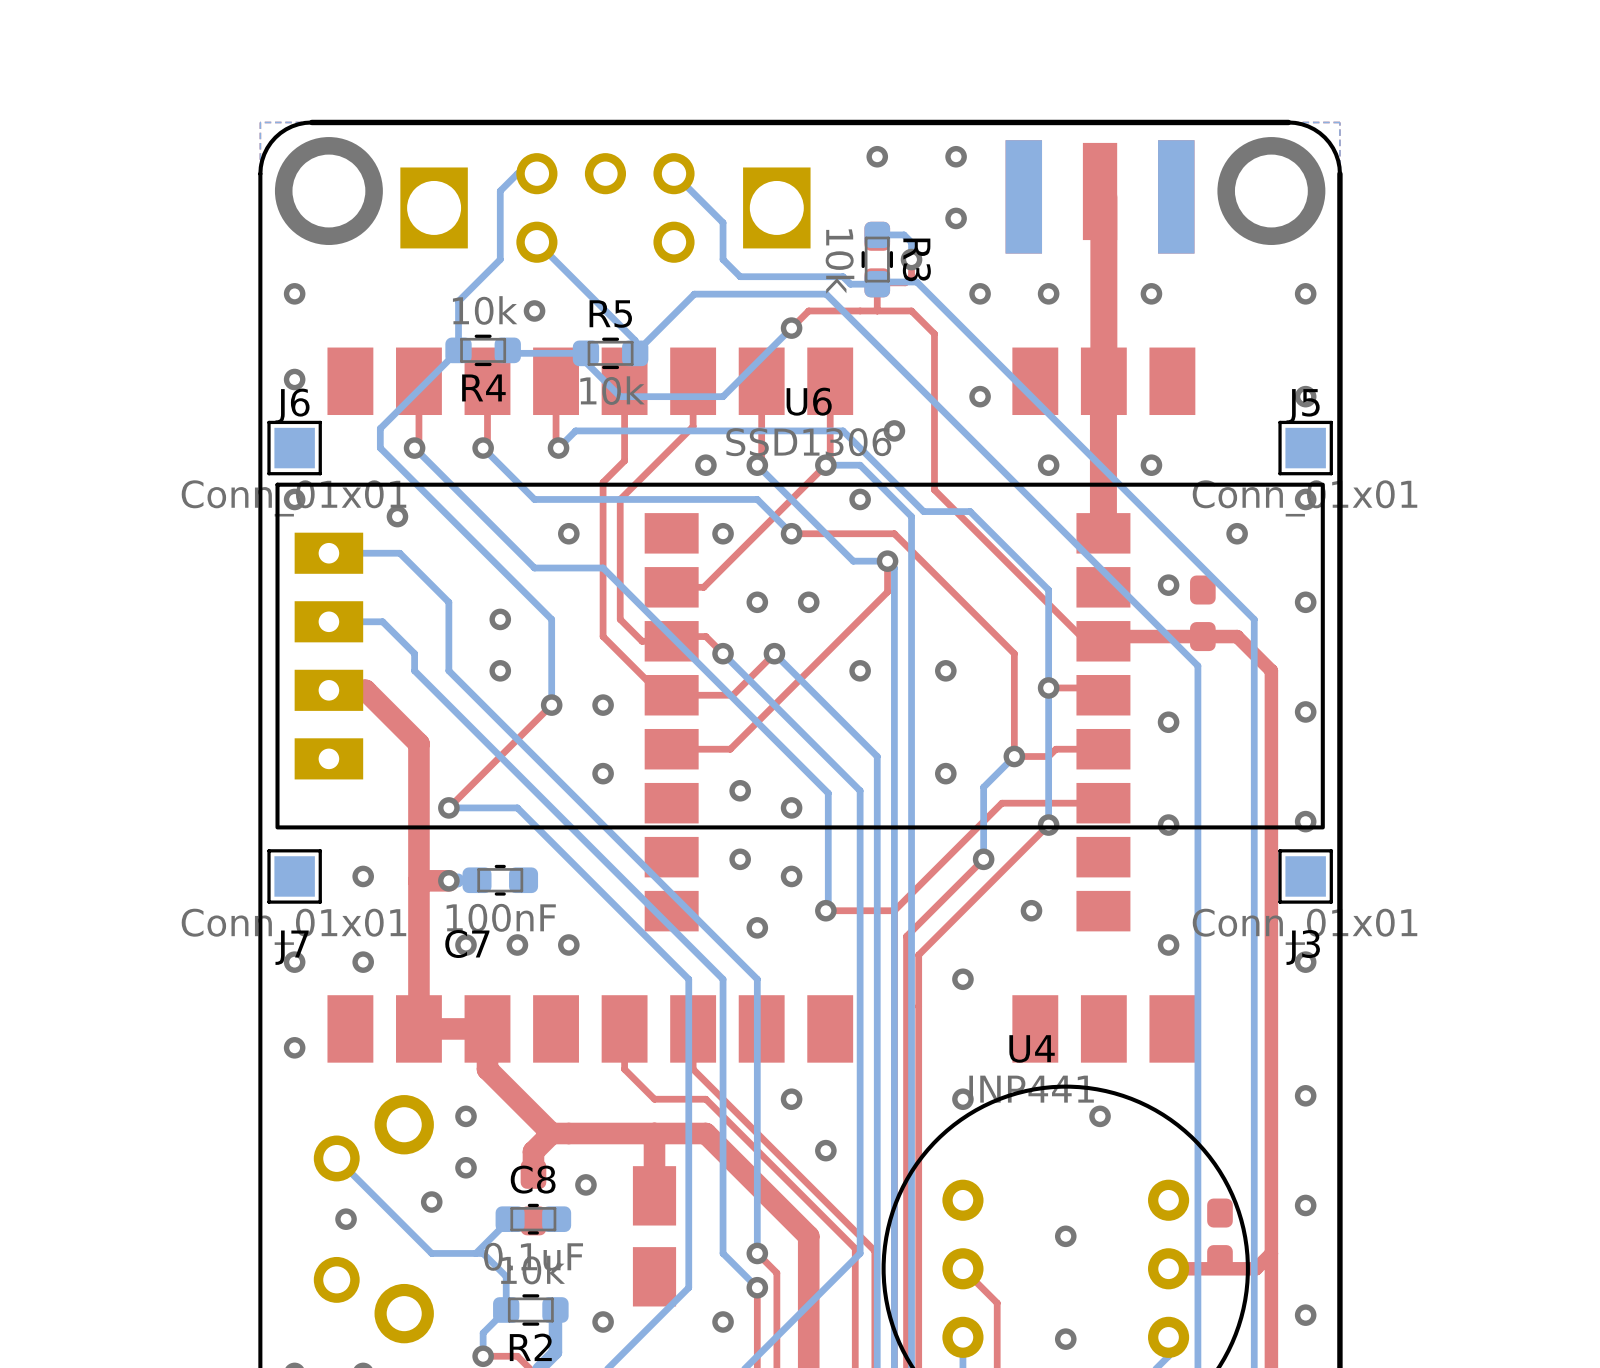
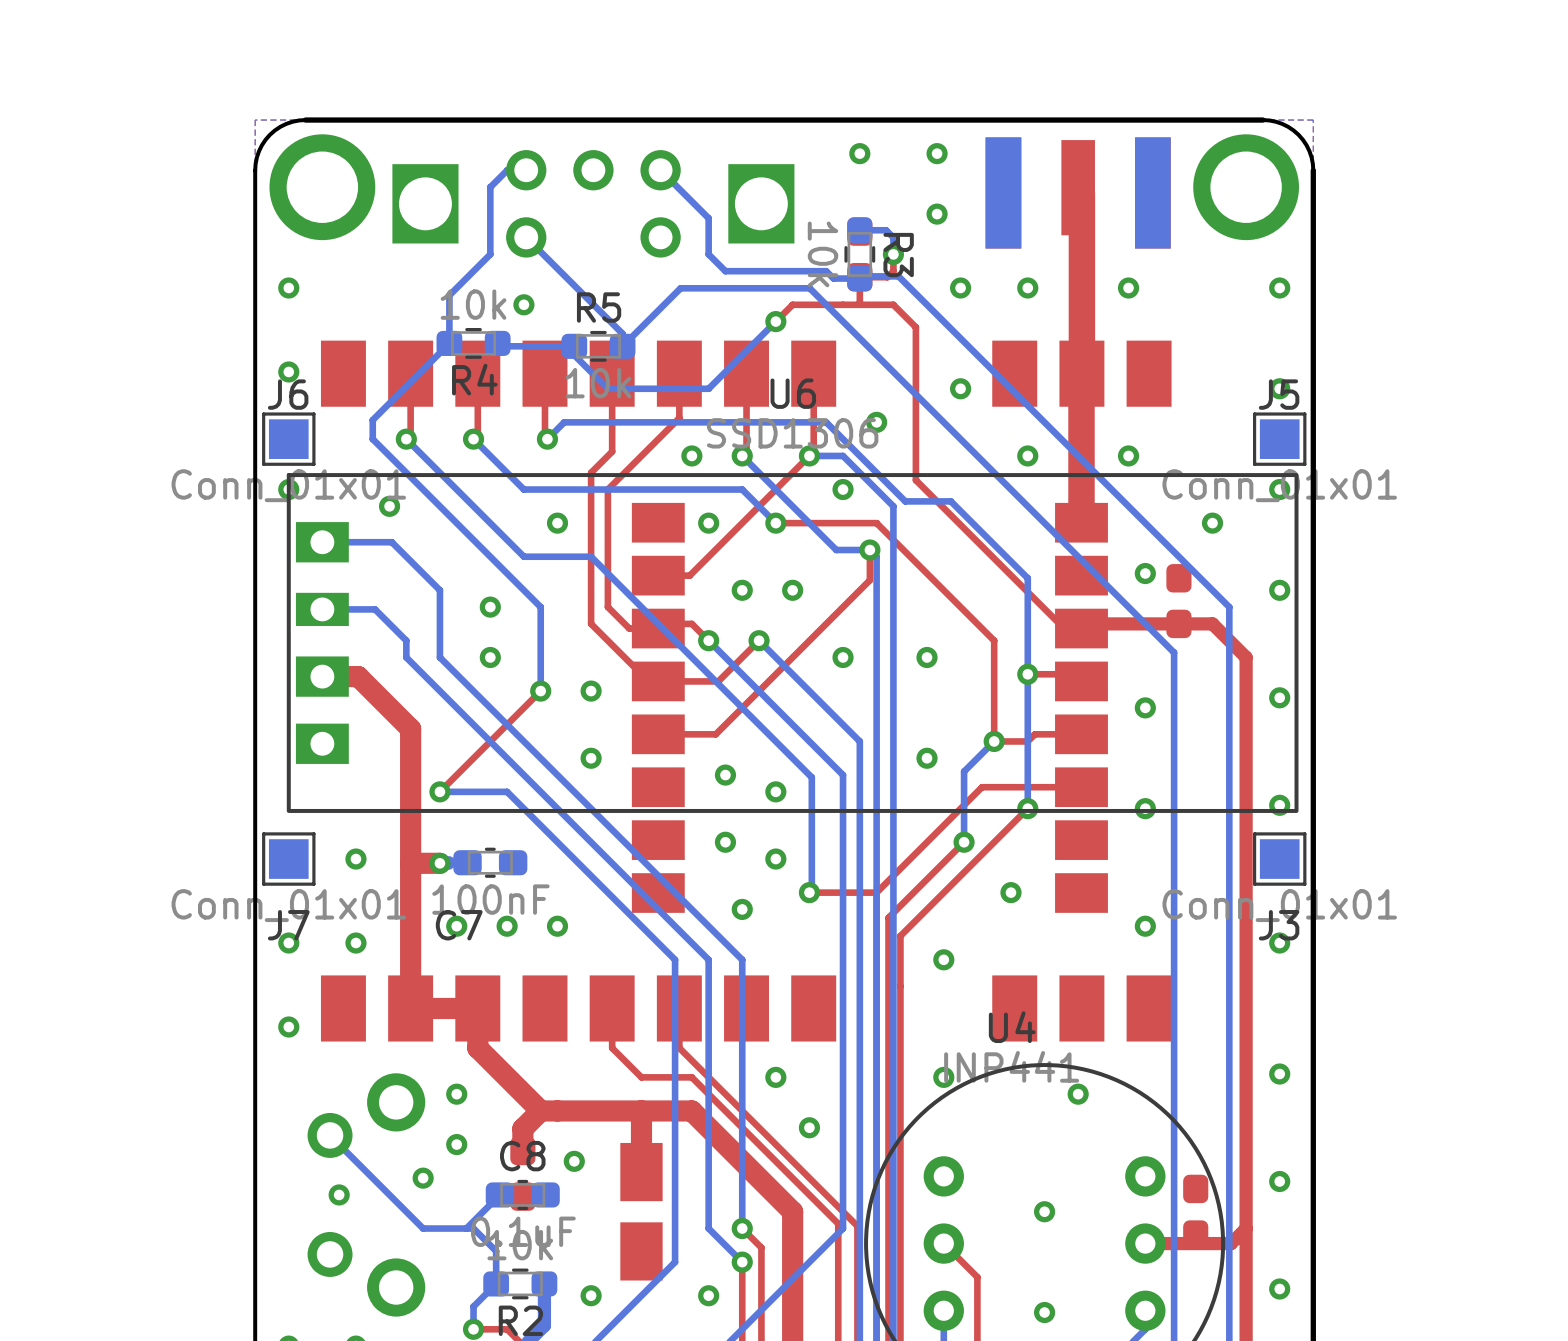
U6 footprint: [275, 482, 1325, 830] -> [286, 473, 1299, 813]

